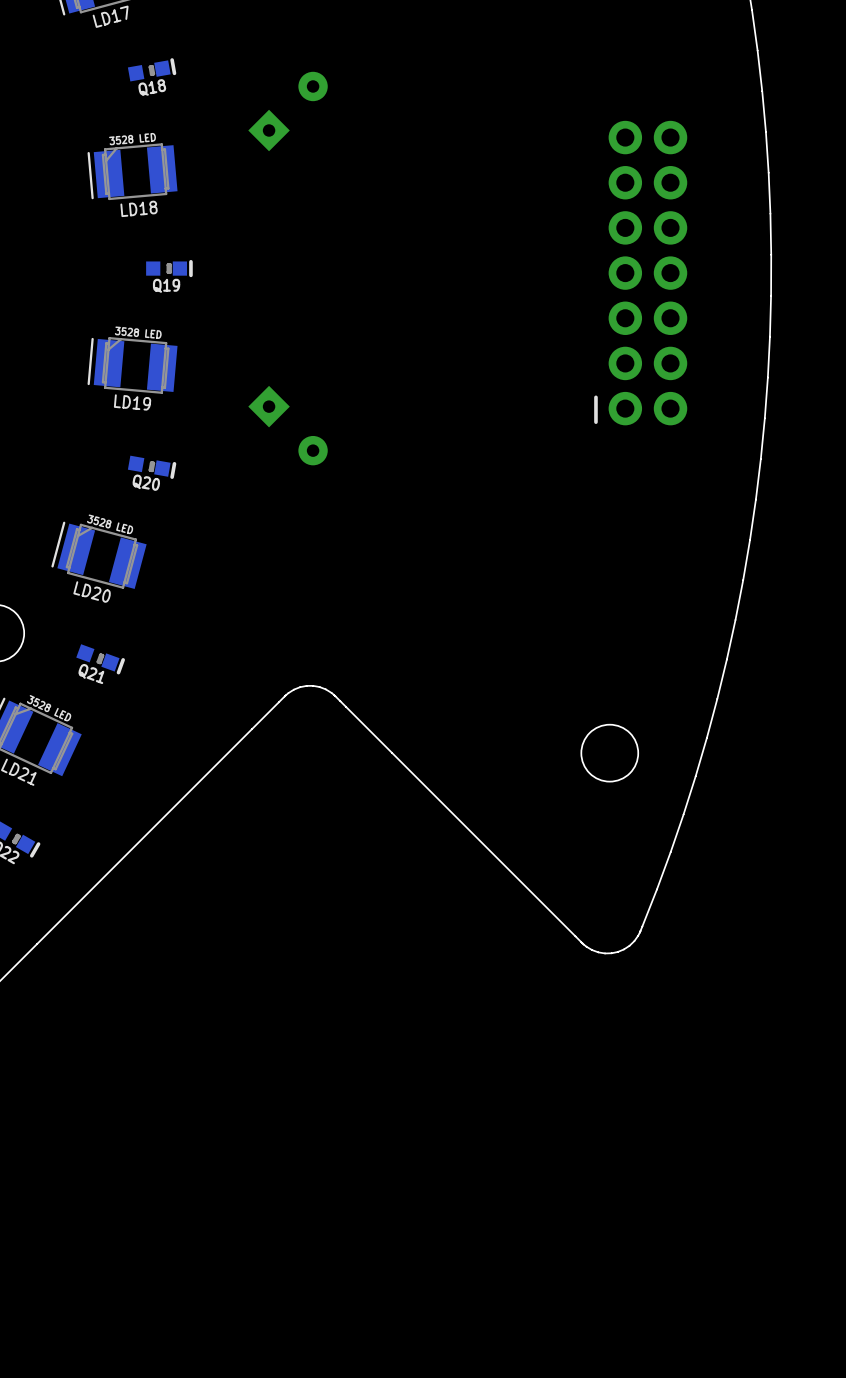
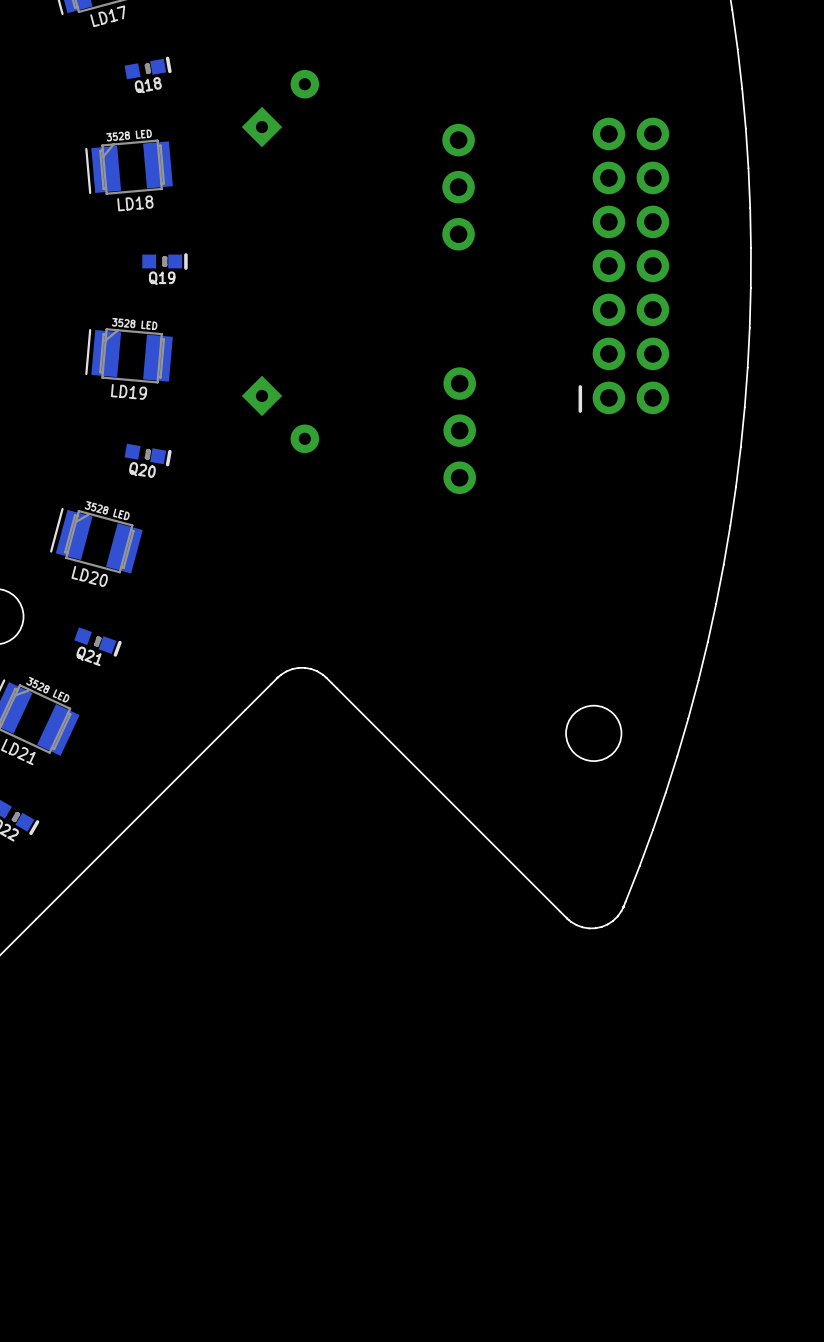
part: none -> (458, 187)
part: none -> (459, 430)

